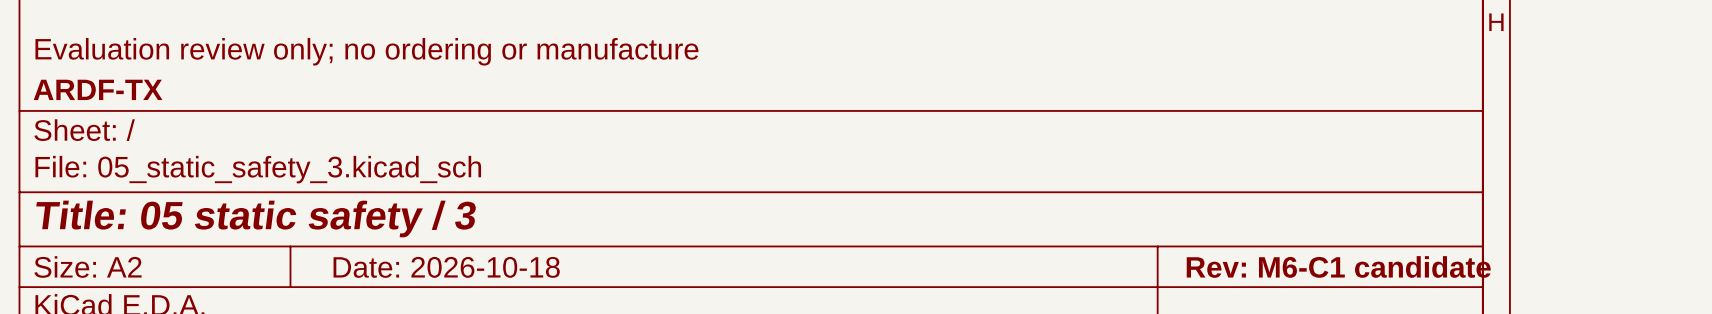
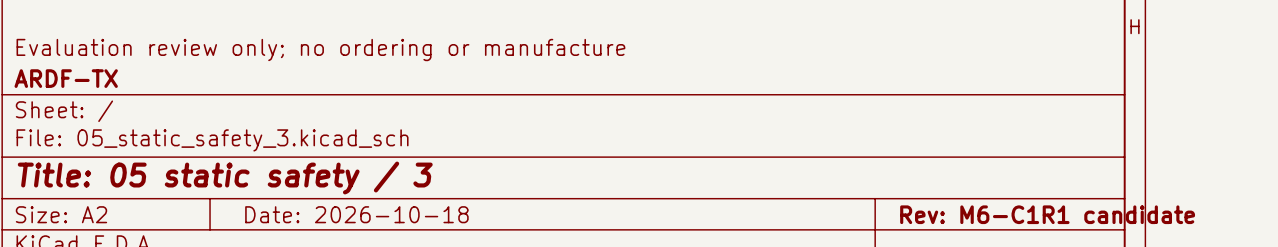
title block: Rev: M6-C1 candidate (1338, 266) -> Rev: M6-C1R1 candidate (1047, 214)

